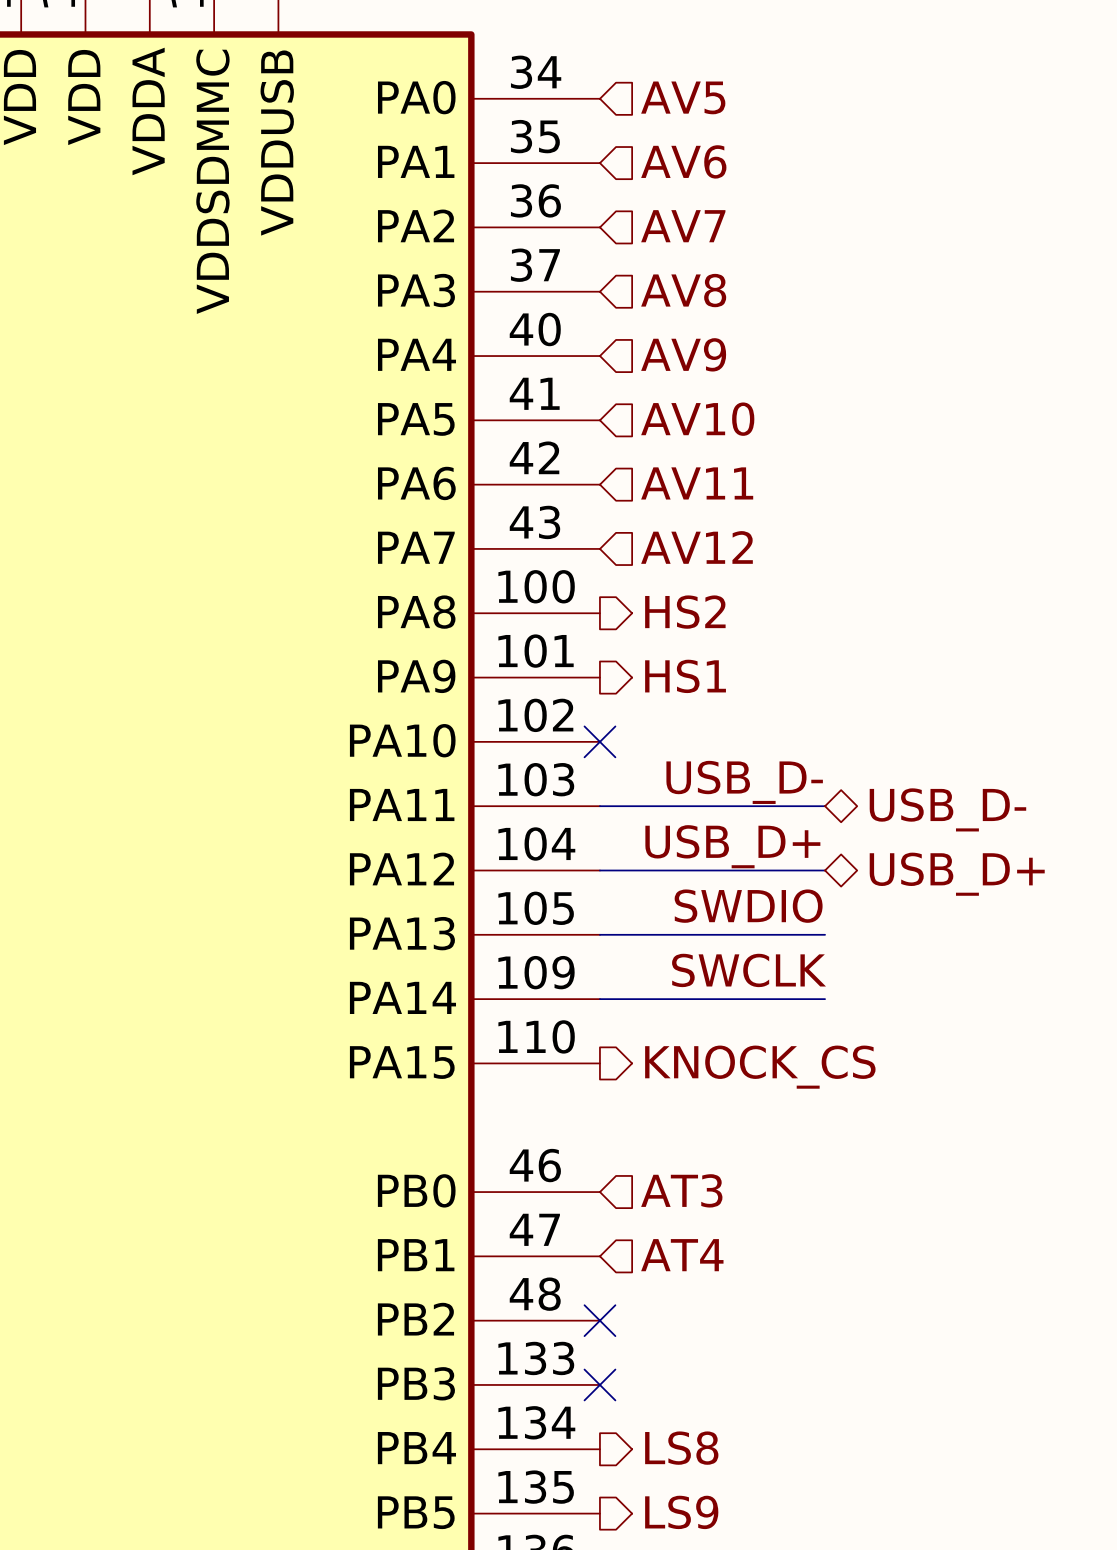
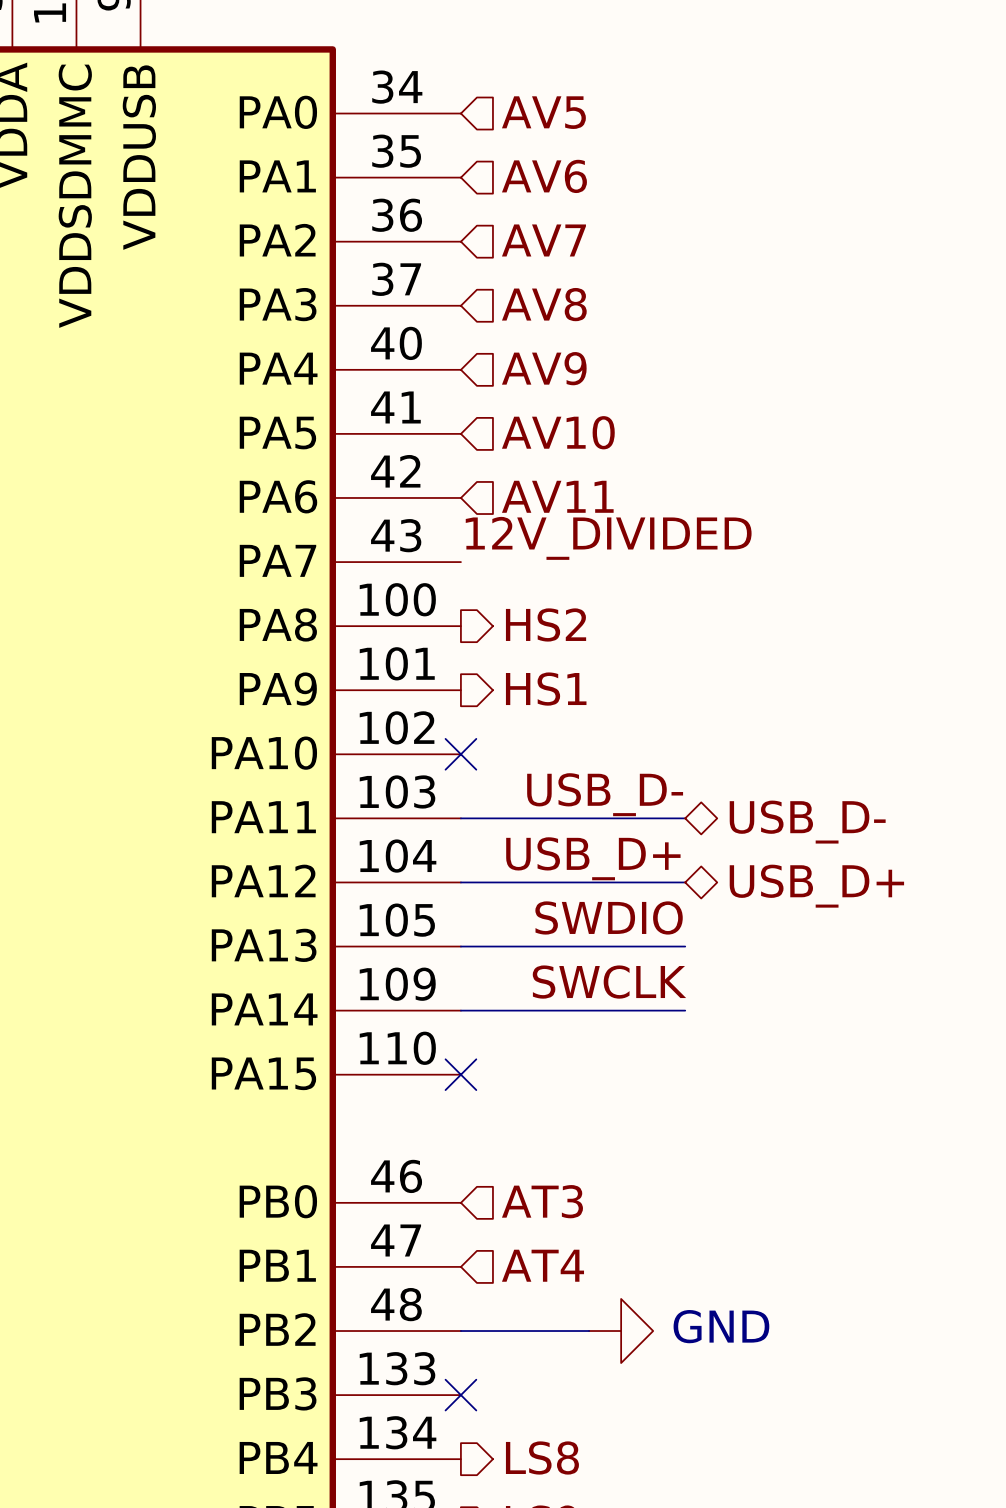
label: none -> 12V_DIVIDED (608, 538)
hierarchical label: AV12 (696, 547) -> none
no-connect mark: none -> (460, 1074)
hierarchical label: KNOCK_CS (760, 1067) -> none
wire: none -> (460, 1331) (589, 1331)
no-connect mark: (599, 1320) -> none
power symbol: none -> GND (621, 1331)

